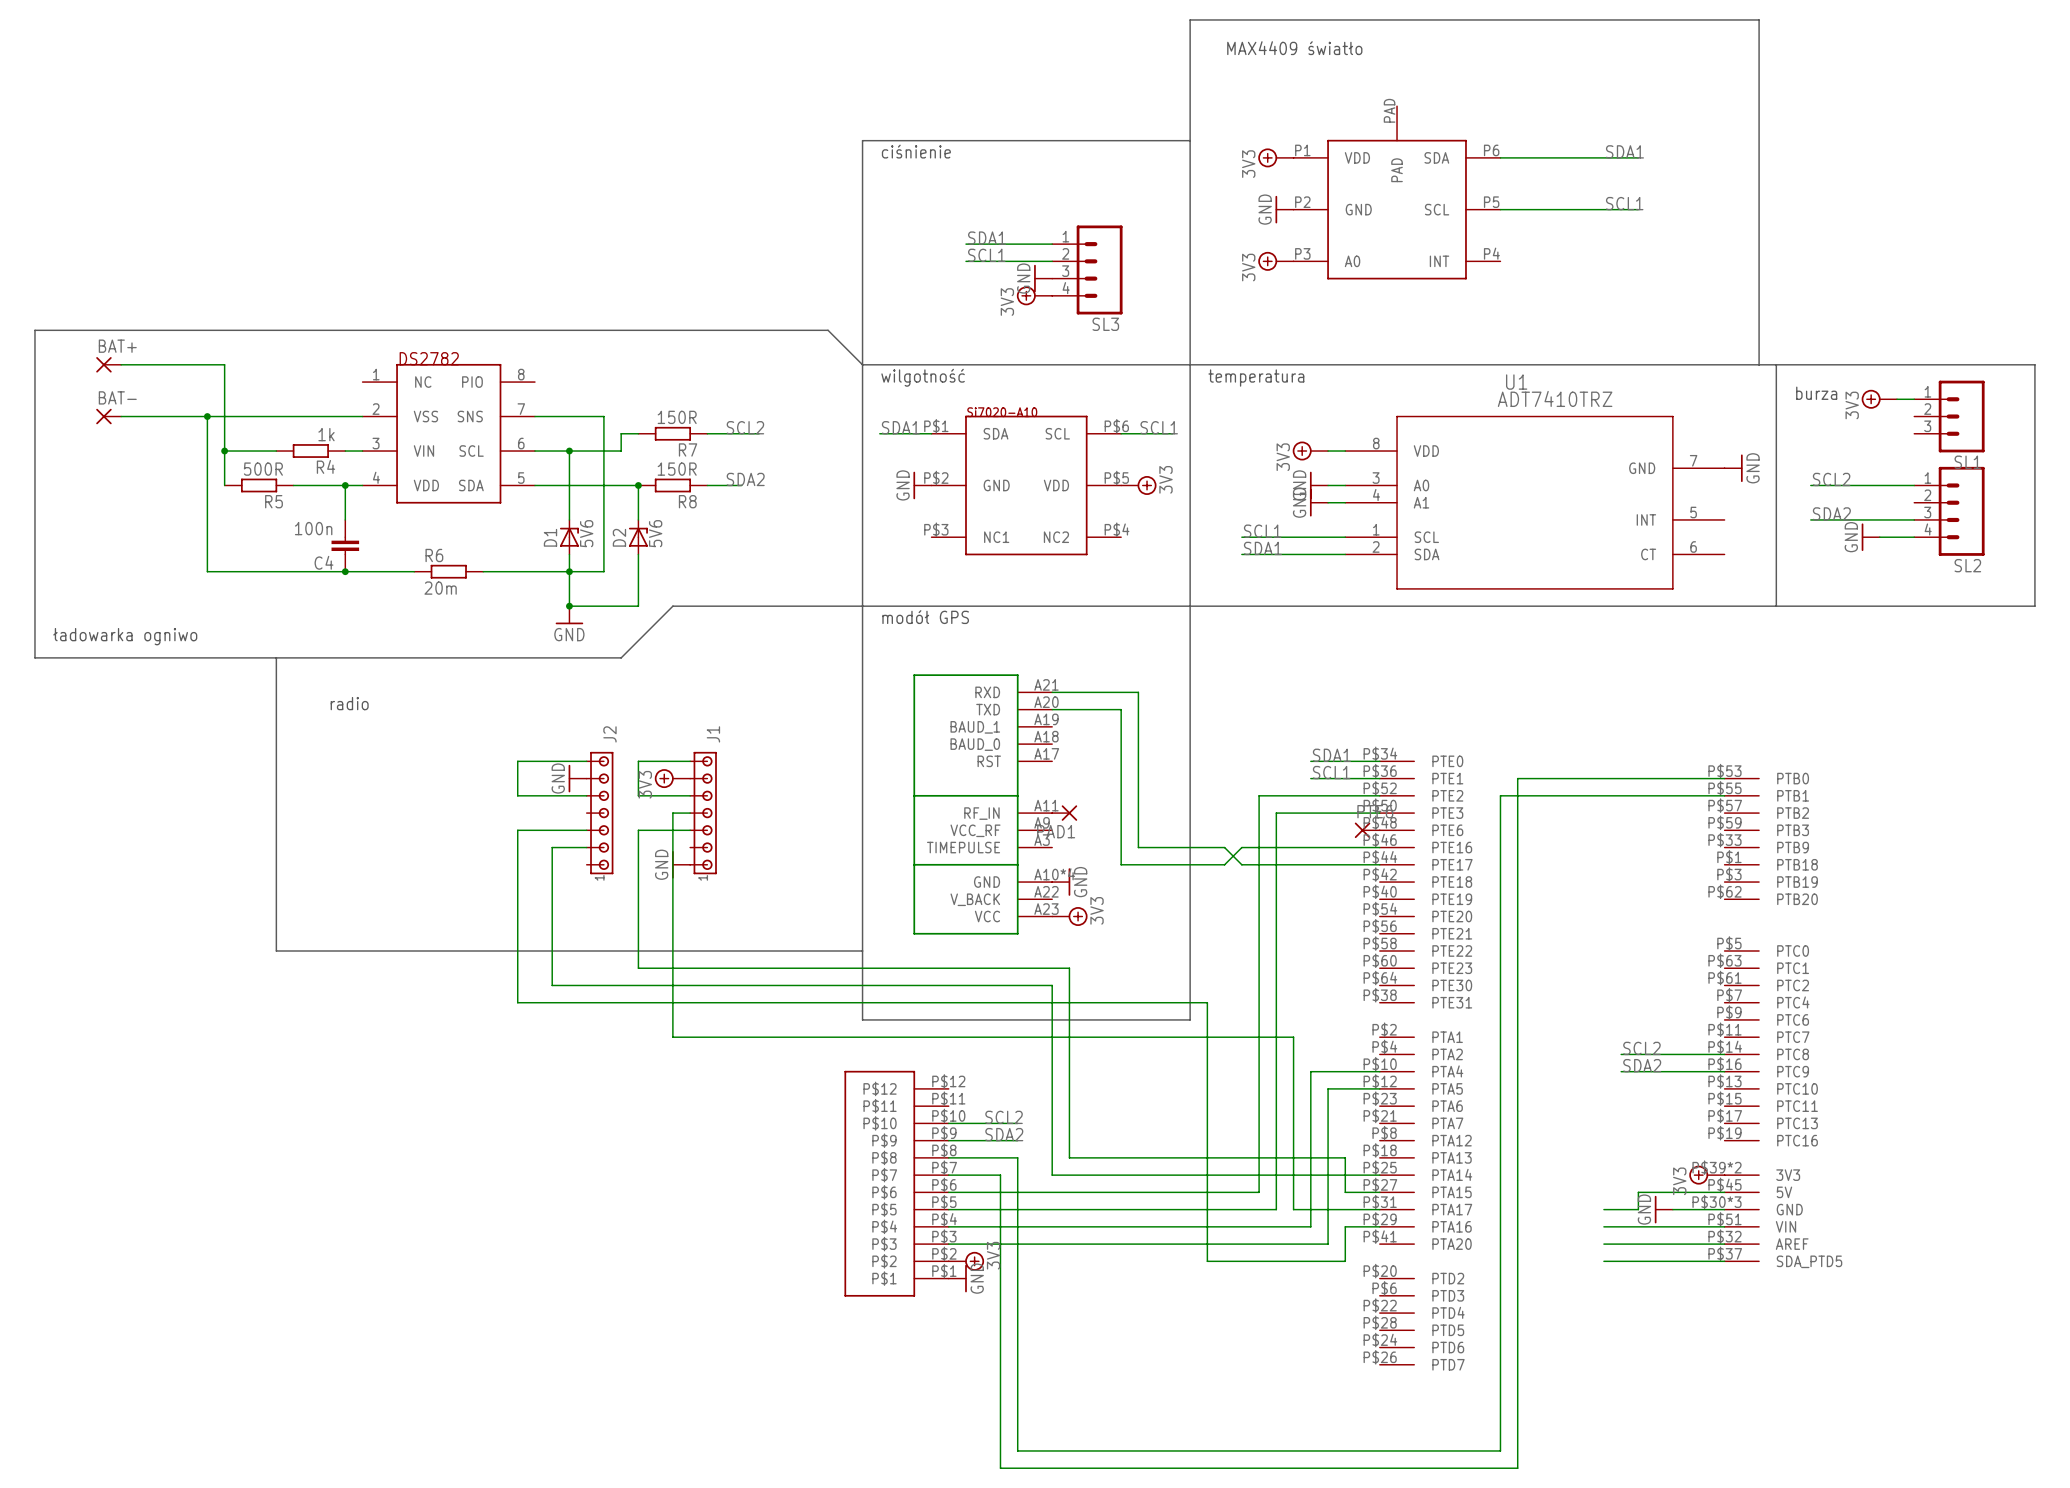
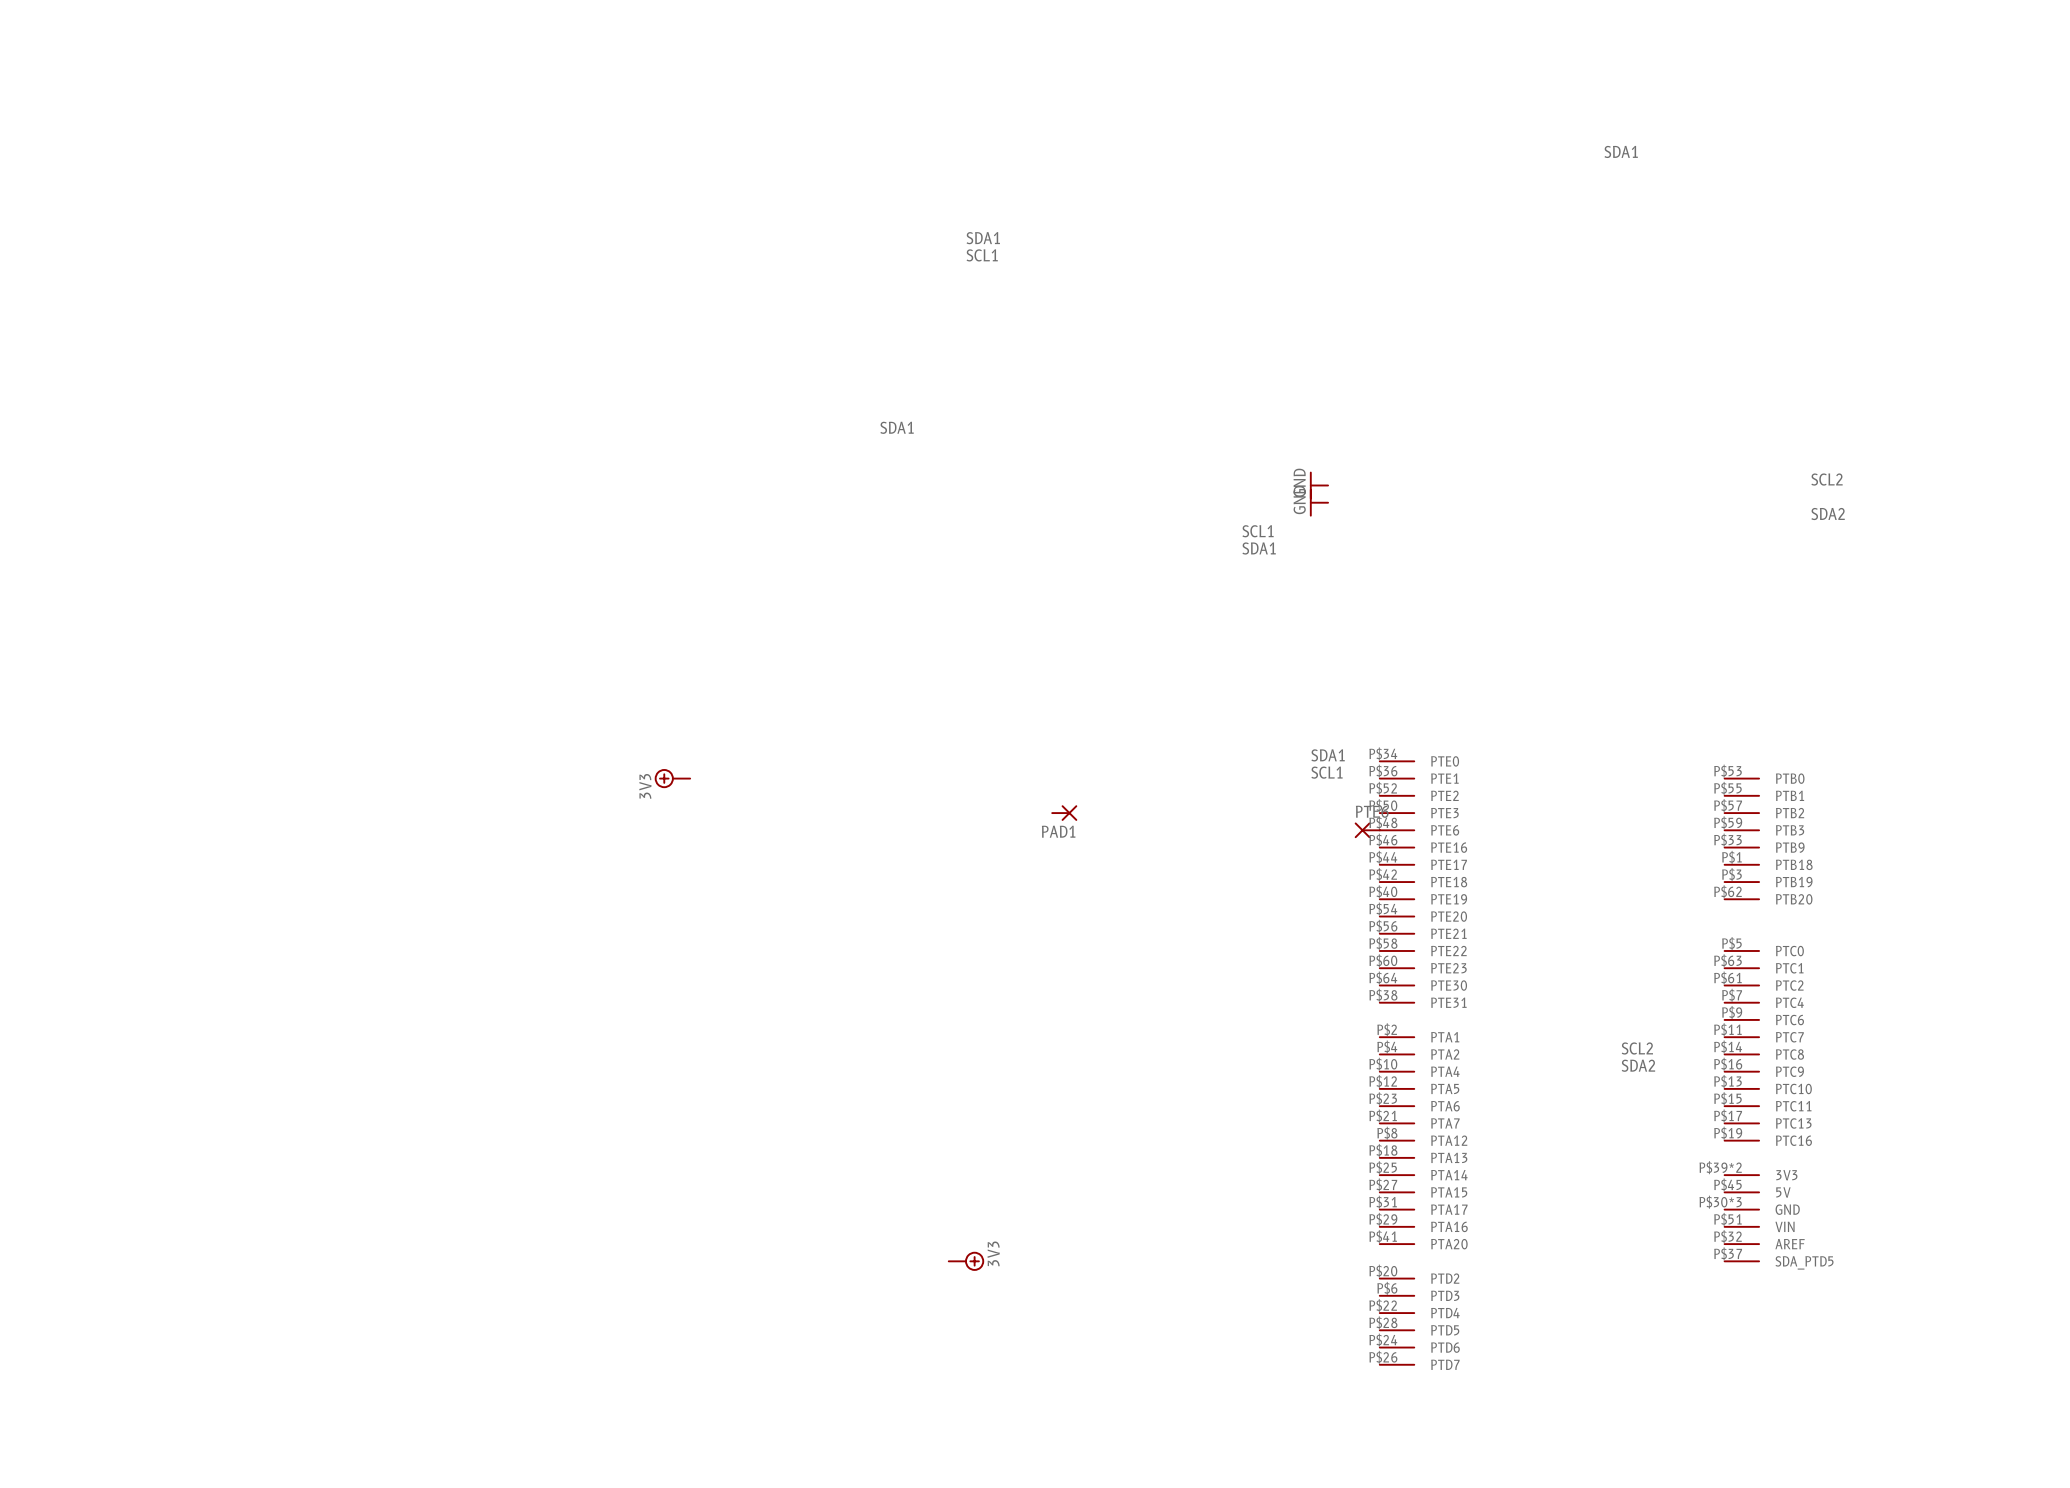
text: MAX4409 światło (1294, 48) -> none
bus: (1190, 140) (862, 140) (862, 1019) (1190, 1019) (1190, 19) (1759, 19) (1759, 364) -> none
text: ciśnienie (916, 151) -> none
power symbol: 3V3 (1275, 157) -> none
wire: (1500, 157) (1638, 157) -> none
part: (1397, 192) -> none
label: SCL1 (1624, 203) -> none
power symbol: GND (1284, 209) -> none
wire: (1500, 209) (1638, 209) -> none
wire: (965, 244) (1052, 244) -> none
wire: (965, 261) (1052, 261) -> none
power symbol: 3V3 (1275, 261) -> none
SL3: (1087, 269) -> none
power symbol: GND (1043, 278) -> none
power symbol: 3V3 (1034, 295) -> none
bus: (34, 330) (34, 657) (621, 657) (672, 606) (2034, 606) (2034, 364) (862, 364) (828, 330) (34, 330) -> none
BAT+: (108, 364) -> none
wire: (121, 364) (224, 364) (224, 485) -> none
bus: (1776, 364) (1776, 606) -> none
text: wilgotność (923, 377) -> none
text: temperatura (1256, 378) -> none
text: burza (1816, 393) -> none
power symbol: 3V3 (1879, 399) -> none
wire: (1897, 399) (1914, 399) -> none
BAT-: (108, 416) -> none
wire: (121, 416) (362, 416) -> none
wire: (207, 416) (207, 571) (414, 571) -> none
junction: (207, 416) -> none
wire: (534, 416) (603, 416) (603, 571) (483, 571) -> none
SL1: (1949, 416) -> none
label: SCL2 (745, 427) -> none
label: SCL1 (1159, 427) -> none
part: (448, 433) -> none
wire: (638, 433) (621, 433) (621, 451) (534, 451) -> none
R7: 150R (672, 433) -> none
wire: (707, 433) (759, 433) -> none
wire: (879, 433) (931, 433) -> none
wire: (1121, 433) (1172, 433) -> none
wire: (224, 451) (276, 451) -> none
junction: (224, 451) -> none
R4: 1k (310, 451) -> none
wire: (345, 451) (362, 451) -> none
wire: (569, 451) (569, 519) -> none
junction: (569, 451) -> none
power symbol: 3V3 (1310, 451) -> none
wire: (1328, 451) (1345, 451) -> none
power symbol: GND (1733, 468) -> none
label: SDA2 (745, 479) -> none
R5: 500R (259, 485) -> none
wire: (293, 485) (362, 485) -> none
wire: (345, 485) (345, 519) -> none
junction: (345, 485) -> none
wire: (534, 485) (638, 485) (638, 519) -> none
junction: (638, 485) -> none
R8: 150R (672, 485) -> none
wire: (707, 485) (741, 485) -> none
power symbol: GND (922, 485) -> none
part: (1026, 485) -> none
power symbol: 3V3 (1138, 485) -> none
wire: (1328, 485) (1345, 485) -> none
wire: (1810, 485) (1914, 485) -> none
wire: (1328, 502) (1345, 502) -> none
U1: ADT7410TRZ (1534, 502) -> none
SL2: (1949, 511) -> none
wire: (1810, 519) (1914, 519) -> none
D1: 5V6 (569, 537) -> none
D2: 5V6 (638, 537) -> none
wire: (1241, 537) (1345, 537) -> none
power symbol: GND (1870, 537) -> none
wire: (1879, 537) (1914, 537) -> none
C4: 100n (345, 545) -> none
wire: (569, 554) (569, 606) (638, 606) (638, 554) -> none
wire: (1241, 554) (1345, 554) -> none
junction: (345, 571) -> none
R6: 20m (448, 571) -> none
junction: (569, 571) -> none
junction: (569, 606) -> none
power symbol: GND (569, 615) -> none
text: modół GPS (925, 617) -> none
text: ładowarka ogniwo (125, 636) -> none
bus: (276, 657) (276, 950) (862, 950) -> none
wire: (1052, 692) (1138, 692) (1138, 847) (1224, 847) (1241, 864) (1379, 864) -> none
text: radio (349, 703) -> none
wire: (1052, 709) (1121, 709) (1121, 864) (1224, 864) (1241, 847) (1379, 847) -> none
wire: (586, 761) (517, 761) (517, 795) (586, 795) -> none
wire: (690, 761) (638, 761) (638, 795) (690, 795) -> none
wire: (1310, 761) (1379, 761) -> none
power symbol: GND (577, 778) -> none
wire: (1310, 778) (1379, 778) -> none
wire: (1724, 778) (1517, 778) (1517, 1468) (1000, 1468) (1000, 1175) (948, 1175) -> none
wire: (1379, 795) (1259, 795) (1259, 1192) (948, 1192) -> none
wire: (1724, 795) (1500, 795) (1500, 1450) (1017, 1450) (1017, 1157) (948, 1157) -> none
part: (982, 804) -> none
J2: (600, 813) -> none
wire: (690, 813) (672, 813) (672, 1037) (1293, 1037) (1293, 1209) (1379, 1209) -> none
J1: (703, 813) -> none
wire: (1379, 813) (1276, 813) (1276, 1209) (948, 1209) -> none
wire: (586, 830) (517, 830) (517, 1002) (1207, 1002) (1207, 1261) (1345, 1261) (1345, 1226) (1379, 1226) -> none
wire: (690, 830) (638, 830) (638, 968) (1069, 968) (1069, 1157) (1345, 1157) (1345, 1192) (1379, 1192) -> none
wire: (586, 847) (552, 847) (552, 985) (1052, 985) (1052, 1175) (1379, 1175) -> none
power symbol: GND (681, 864) -> none
power symbol: GND (1061, 882) -> none
power symbol: 3V3 (1069, 916) -> none
wire: (1621, 1054) (1724, 1054) -> none
wire: (1379, 1071) (1310, 1071) (1310, 1226) (948, 1226) -> none
wire: (1621, 1071) (1724, 1071) -> none
wire: (1379, 1088) (1328, 1088) (1328, 1244) (948, 1244) -> none
label: SCL2 (1004, 1117) -> none
wire: (948, 1123) (1017, 1123) -> none
label: SDA2 (1004, 1134) -> none
wire: (948, 1140) (1017, 1140) -> none
power symbol: 3V3 (1706, 1175) -> none
part: (896, 1183) -> none
wire: (1724, 1192) (1638, 1192) (1638, 1209) (1603, 1209) -> none
power symbol: GND (1663, 1209) -> none
wire: (1672, 1209) (1724, 1209) -> none
wire: (1603, 1226) (1724, 1226) -> none
wire: (1603, 1244) (1724, 1244) -> none
wire: (1603, 1261) (1724, 1261) -> none
power symbol: GND (957, 1278) -> none

